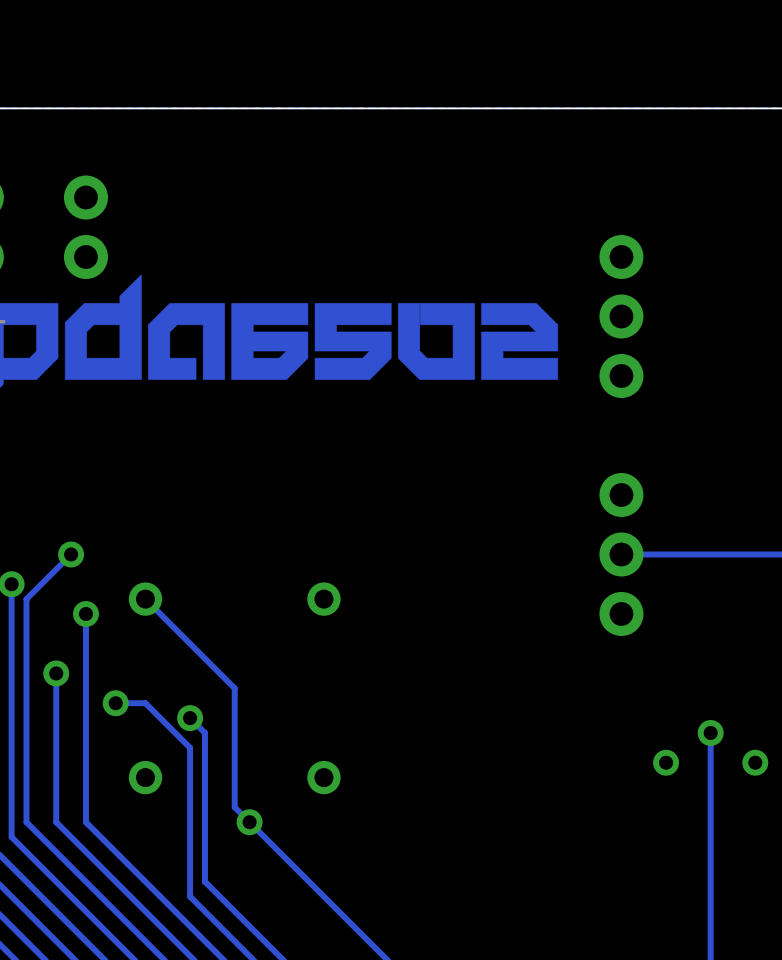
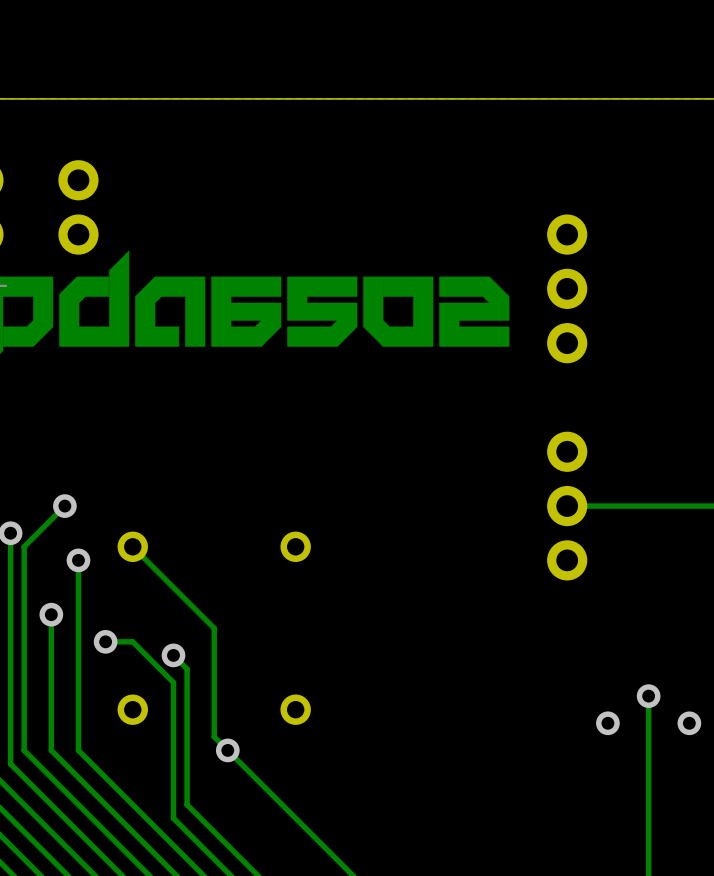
track: (710, 732) (710, 762) -> none
via: (710, 732) -> none
via: (666, 762) -> none
via: none -> (648, 696)
via: (755, 762) -> none
via: none -> (607, 723)
via: none -> (689, 723)

